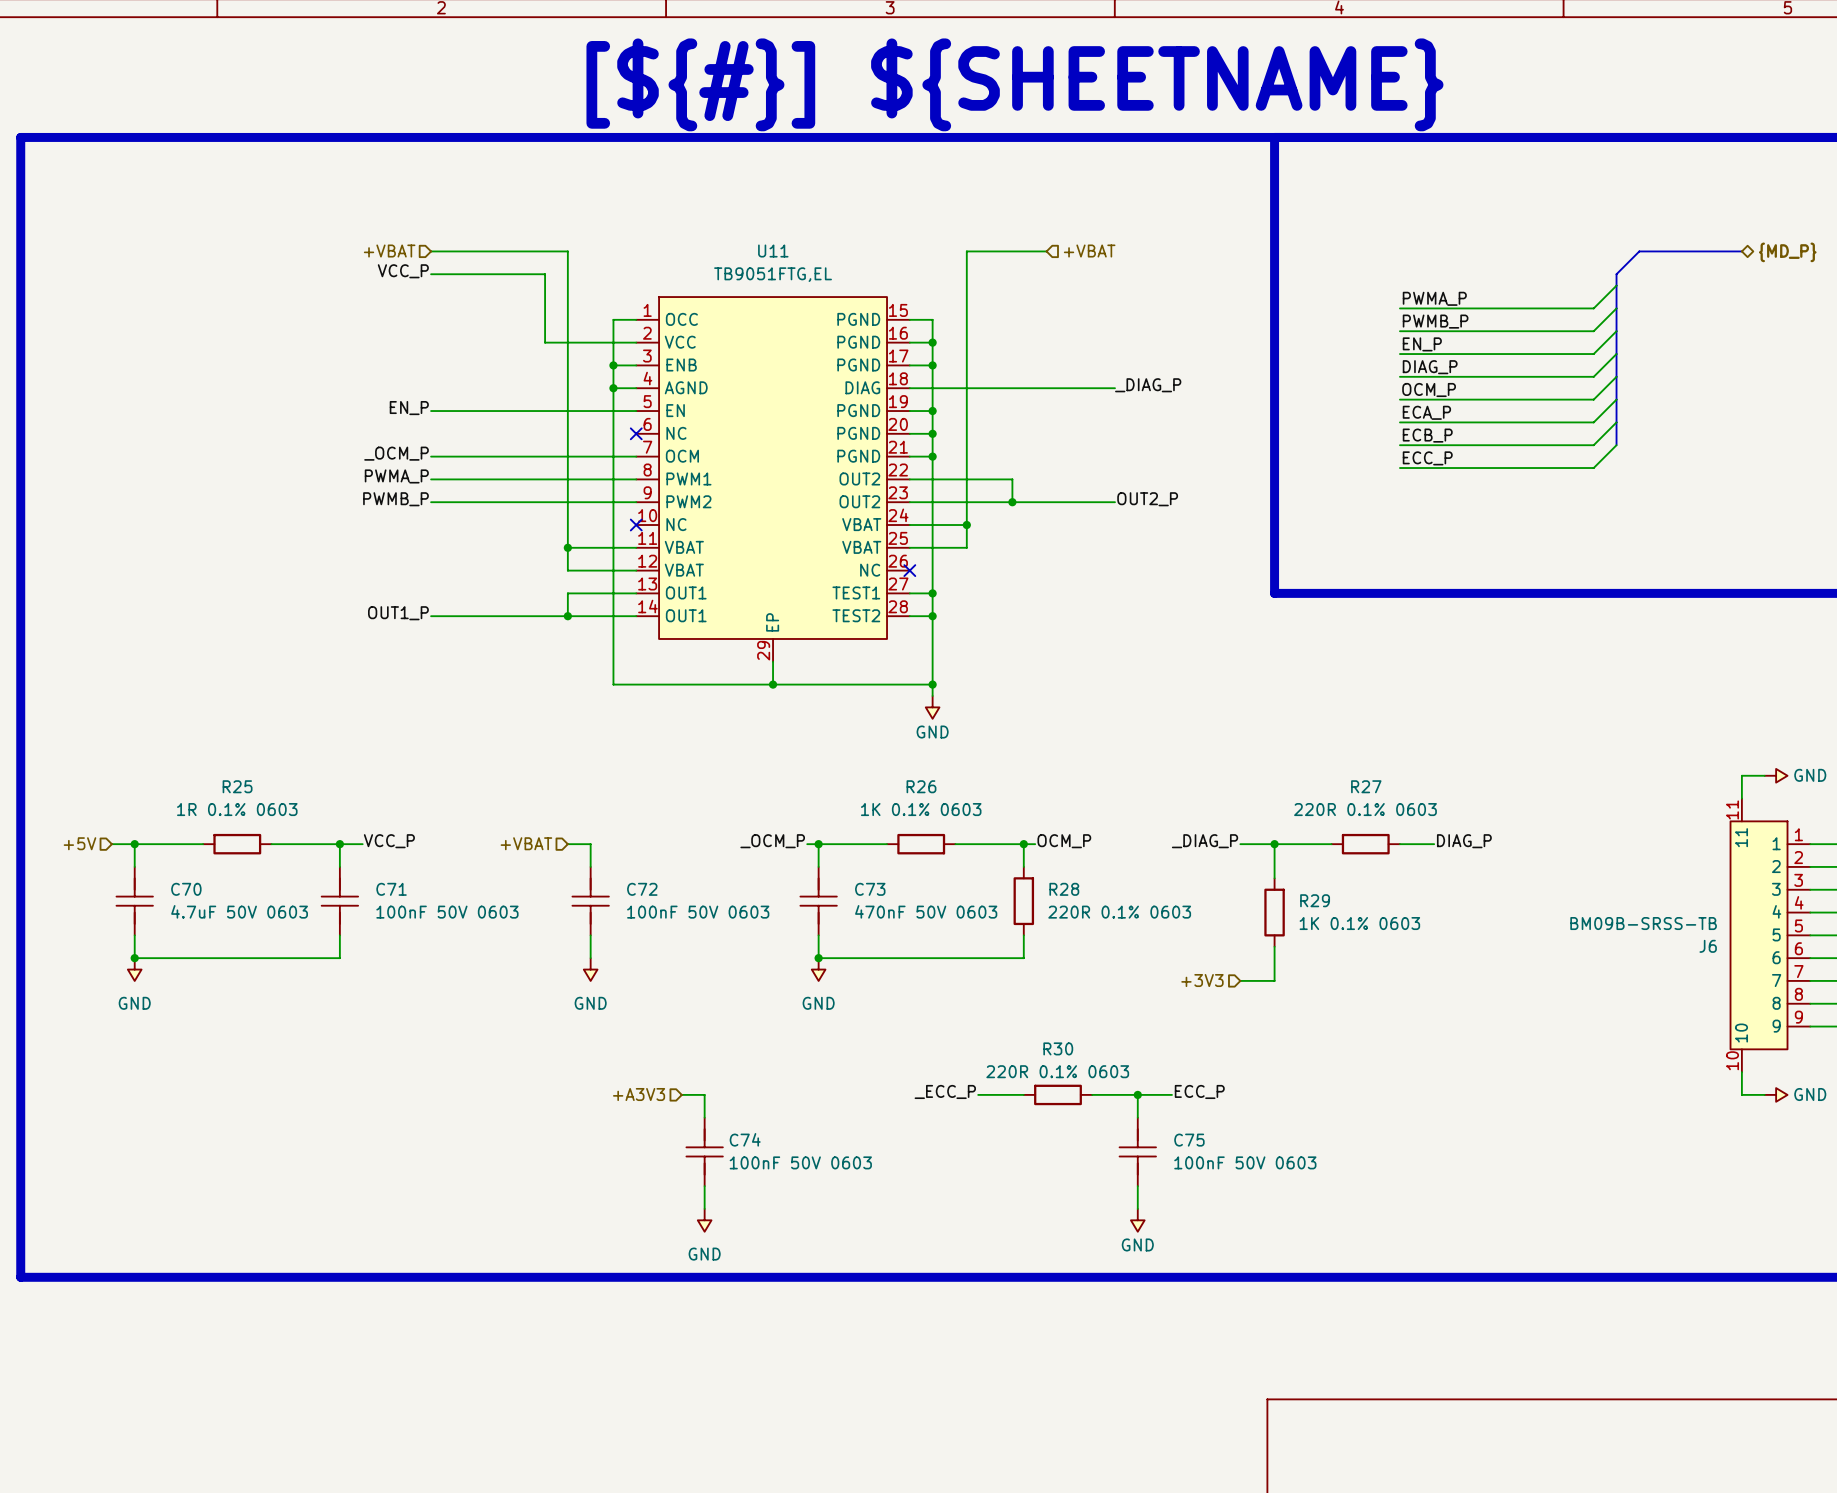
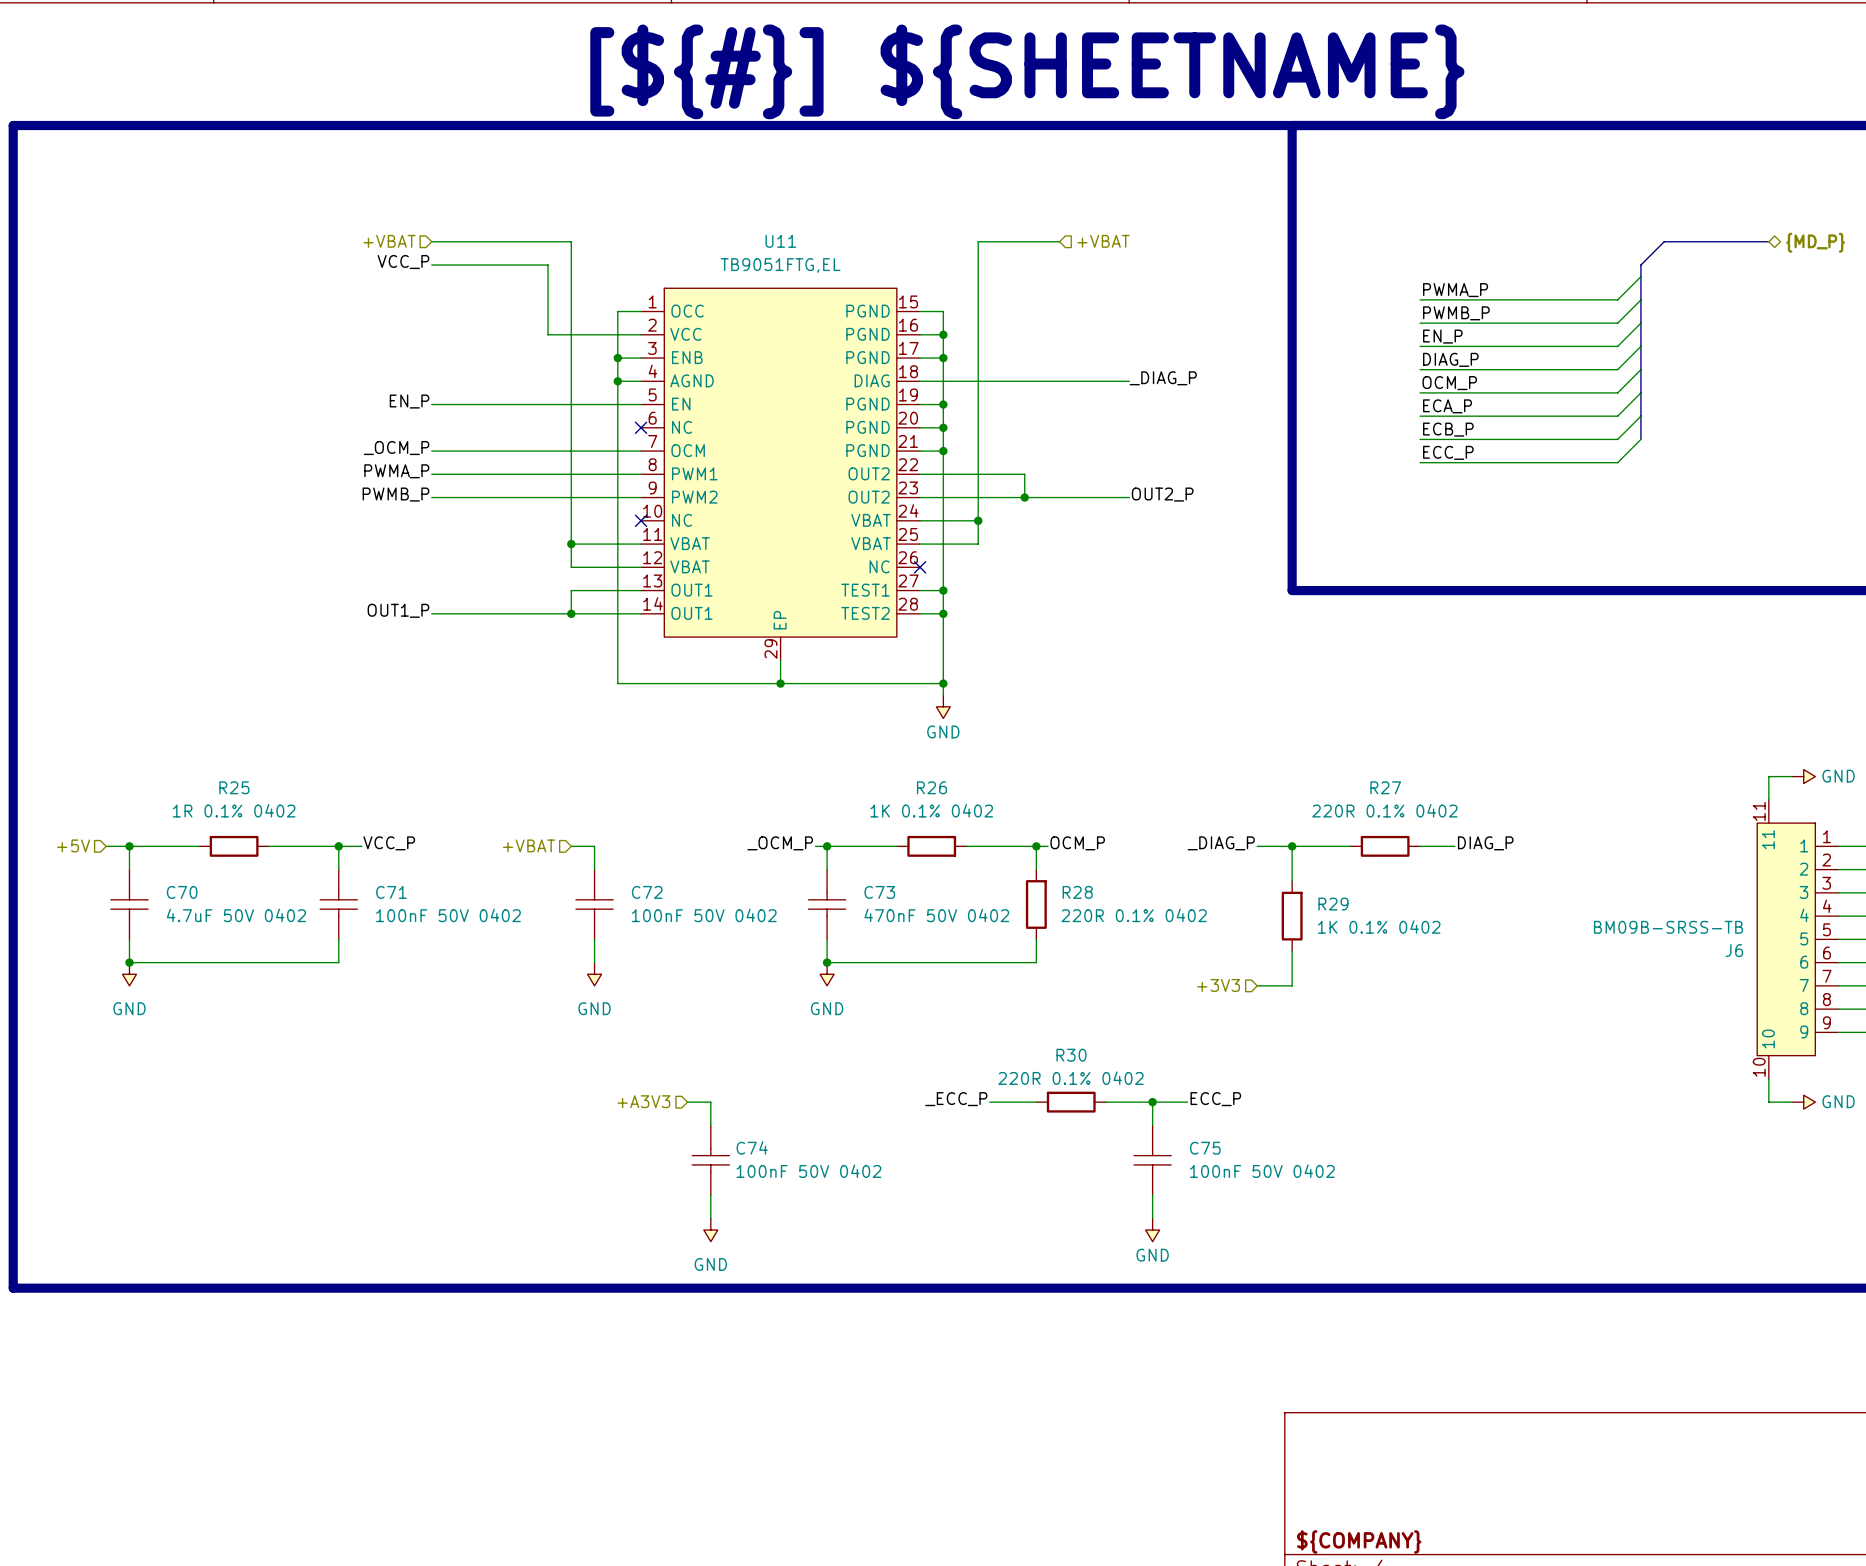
R25 value: 1R 0.1% 0603 (237, 809) -> 1R 0.1% 0402 (234, 810)
R26 value: 1K 0.1% 0603 (921, 809) -> 1K 0.1% 0402 (931, 810)
R27 value: 220R 0.1% 0603 (1365, 809) -> 220R 0.1% 0402 (1384, 810)
C70 symbol: [116, 866, 153, 936] -> [110, 869, 149, 940]
C71 symbol: [321, 866, 359, 936] -> [320, 869, 358, 940]
C72 symbol: [572, 866, 609, 936] -> [575, 869, 614, 940]
C73 symbol: [800, 866, 837, 936] -> [808, 869, 846, 940]
C70 value: 4.7uF 50V 0603 (239, 911) -> 4.7uF 50V 0402 (236, 915)
C73 value: 470nF 50V 0603 (926, 911) -> 470nF 50V 0402 (936, 915)
C71 value: 100nF 50V 0603 (447, 912) -> 100nF 50V 0402 (448, 915)
C72 value: 100nF 50V 0603 (698, 912) -> 100nF 50V 0402 (704, 915)
R28 value: 220R 0.1% 0603 (1119, 912) -> 220R 0.1% 0402 (1134, 915)
R29 value: 1K 0.1% 0603 (1359, 923) -> 1K 0.1% 0402 (1379, 927)
R30 value: 220R 0.1% 0603 (1057, 1071) -> 220R 0.1% 0402 (1070, 1078)
C74 symbol: [686, 1117, 723, 1187] -> [692, 1125, 730, 1196]
C75 symbol: [1119, 1117, 1157, 1187] -> [1134, 1125, 1172, 1196]
C74 value: 100nF 50V 0603 (800, 1162) -> 100nF 50V 0402 (808, 1171)
C75 value: 100nF 50V 0603 (1245, 1162) -> 100nF 50V 0402 (1262, 1171)

